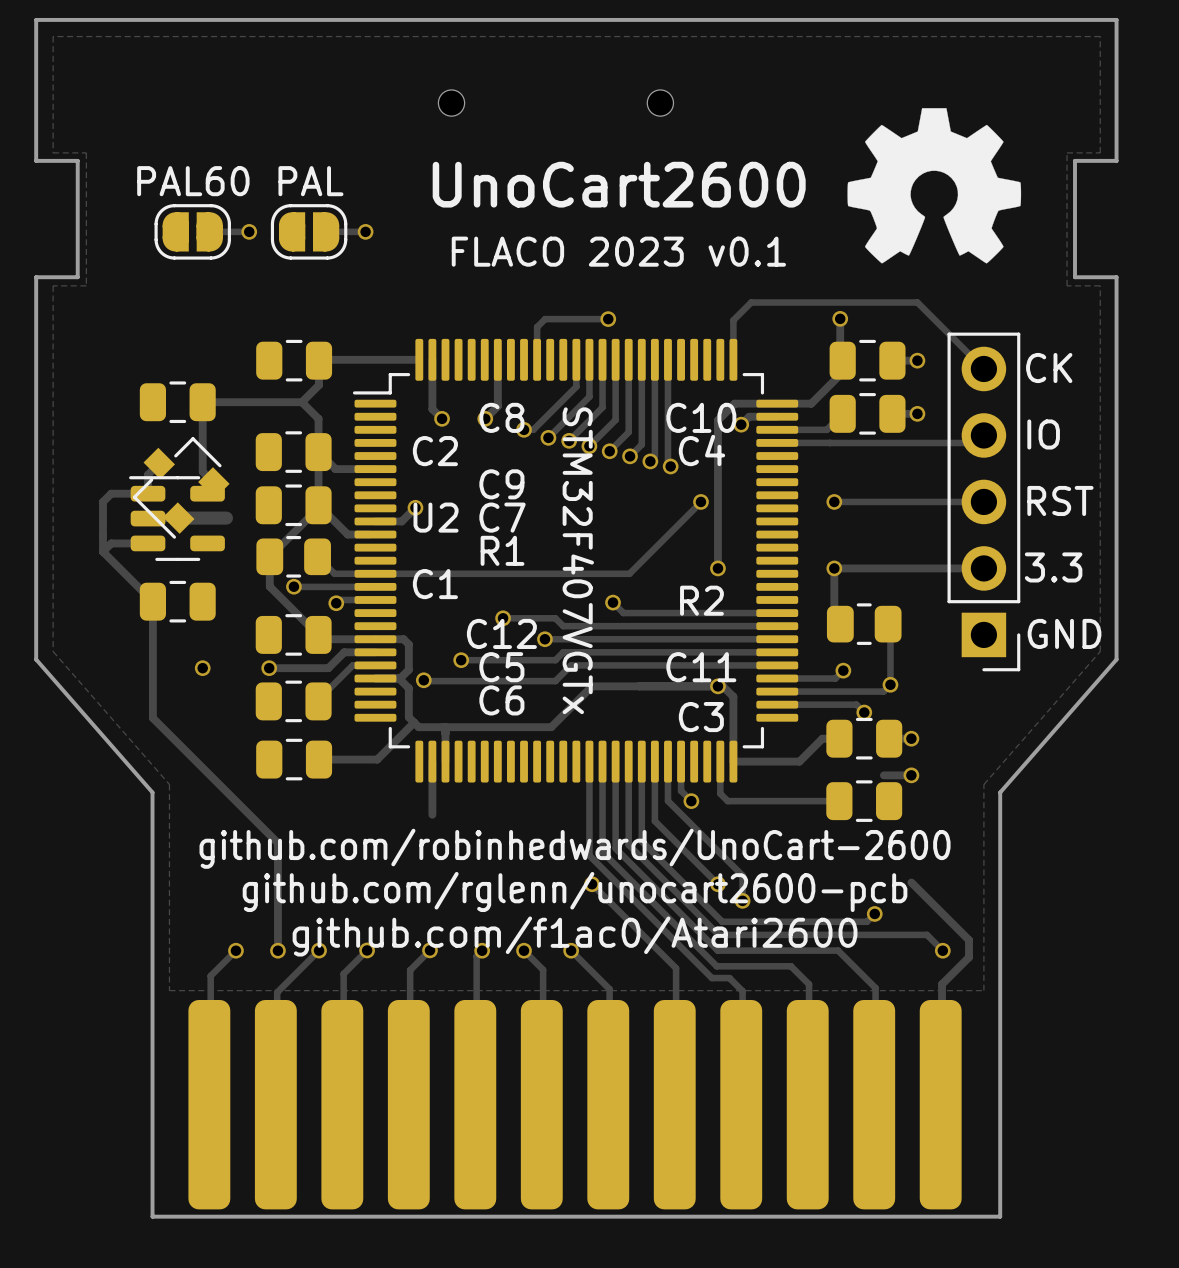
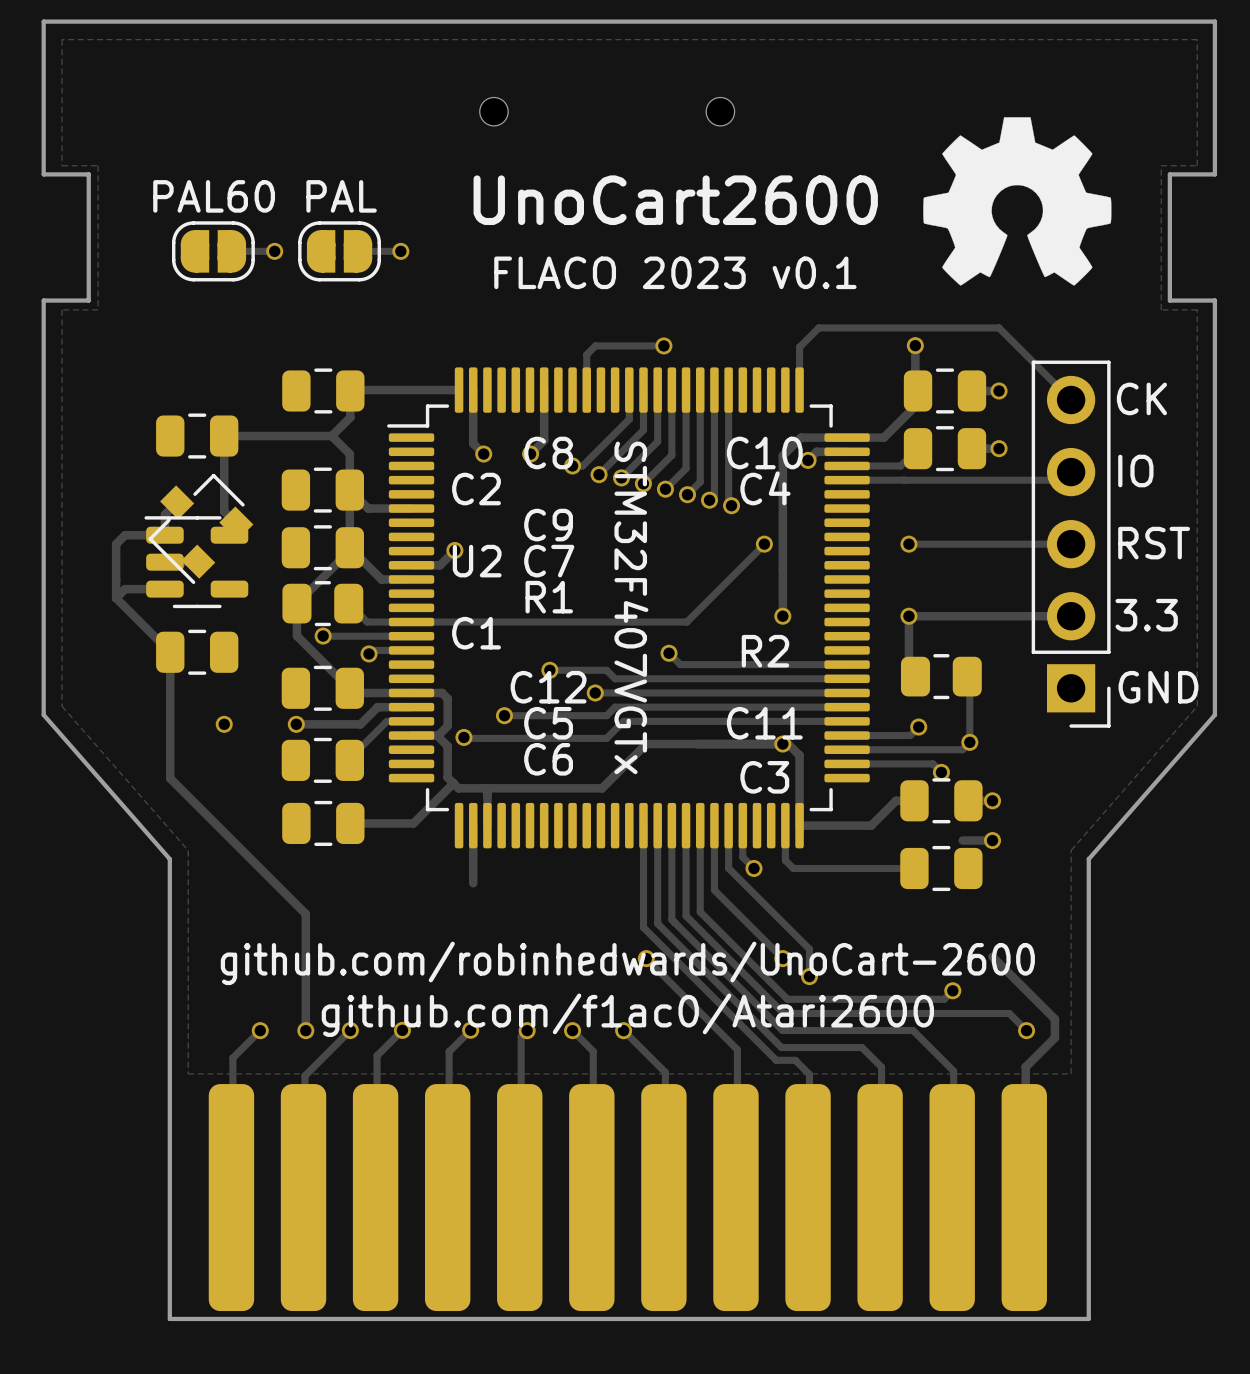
track: (178, 518) (226, 518) -> none
text: github.com/robinhedwards/UnoCart-2600 (575, 848) -> none
text: github.com/rglenn/unocart2600-pcb (575, 891) -> github.com/robinhedwards/UnoCart-2600 (627, 963)

